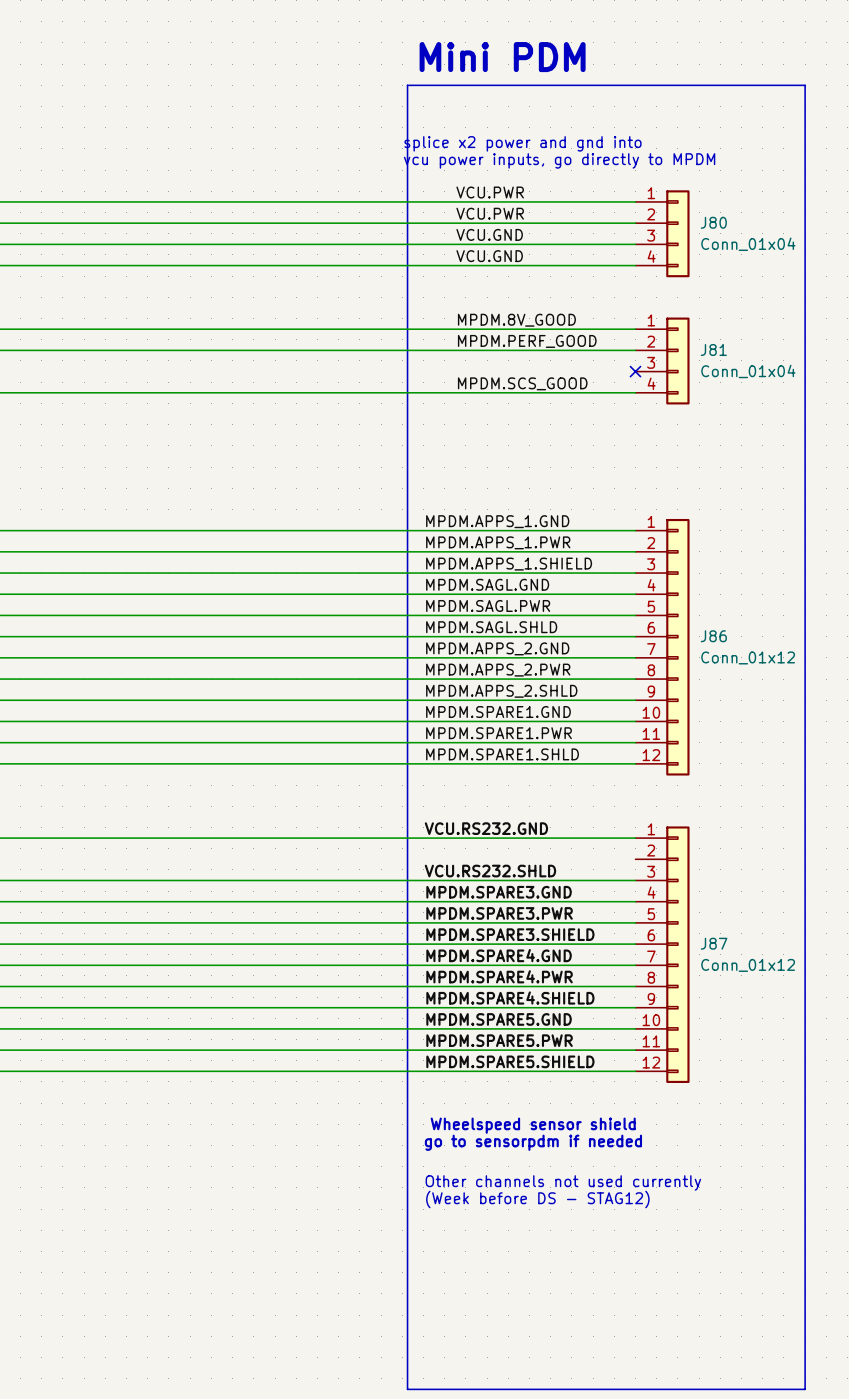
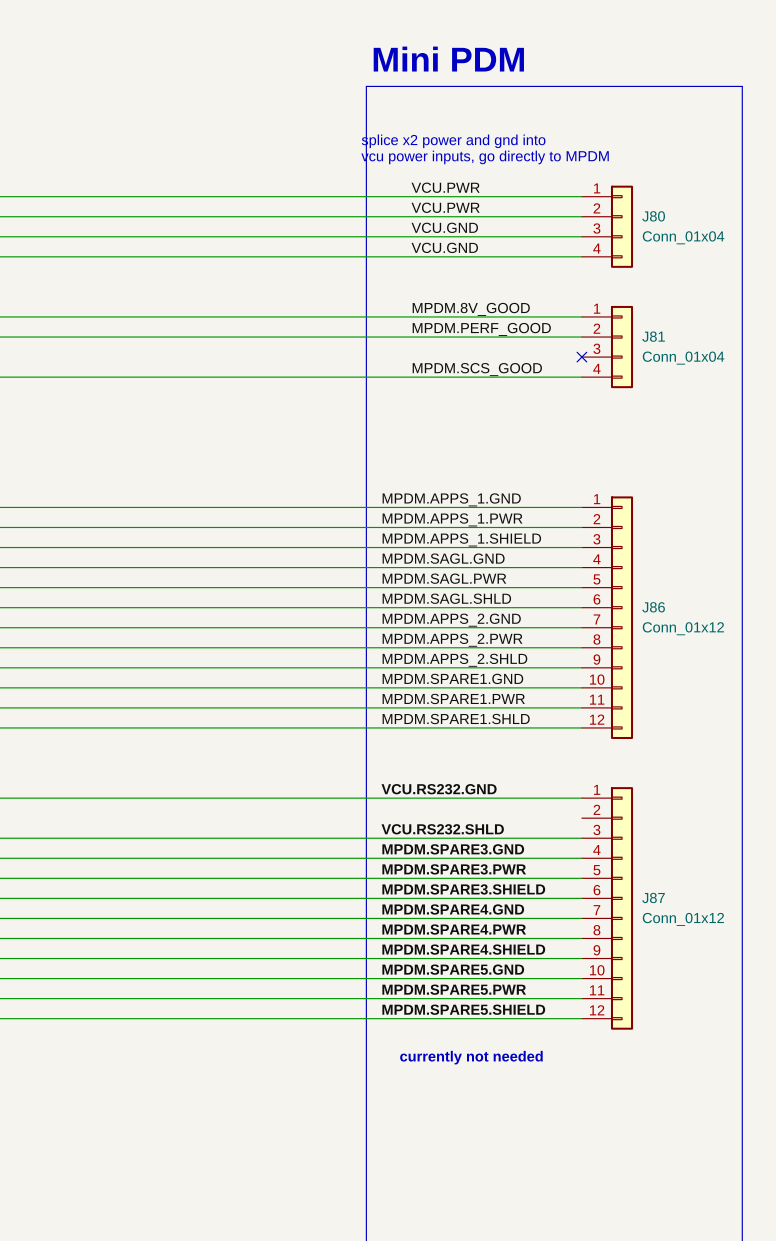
text: none -> currently not needed (471, 1057)
text: Wheelspeed sensor shield (533, 1125) -> none
text: go to sensorpdm if needed (533, 1142) -> none
text: Other channels not used currently (563, 1182) -> none
text: (Week before DS - STAG12) (537, 1199) -> none

